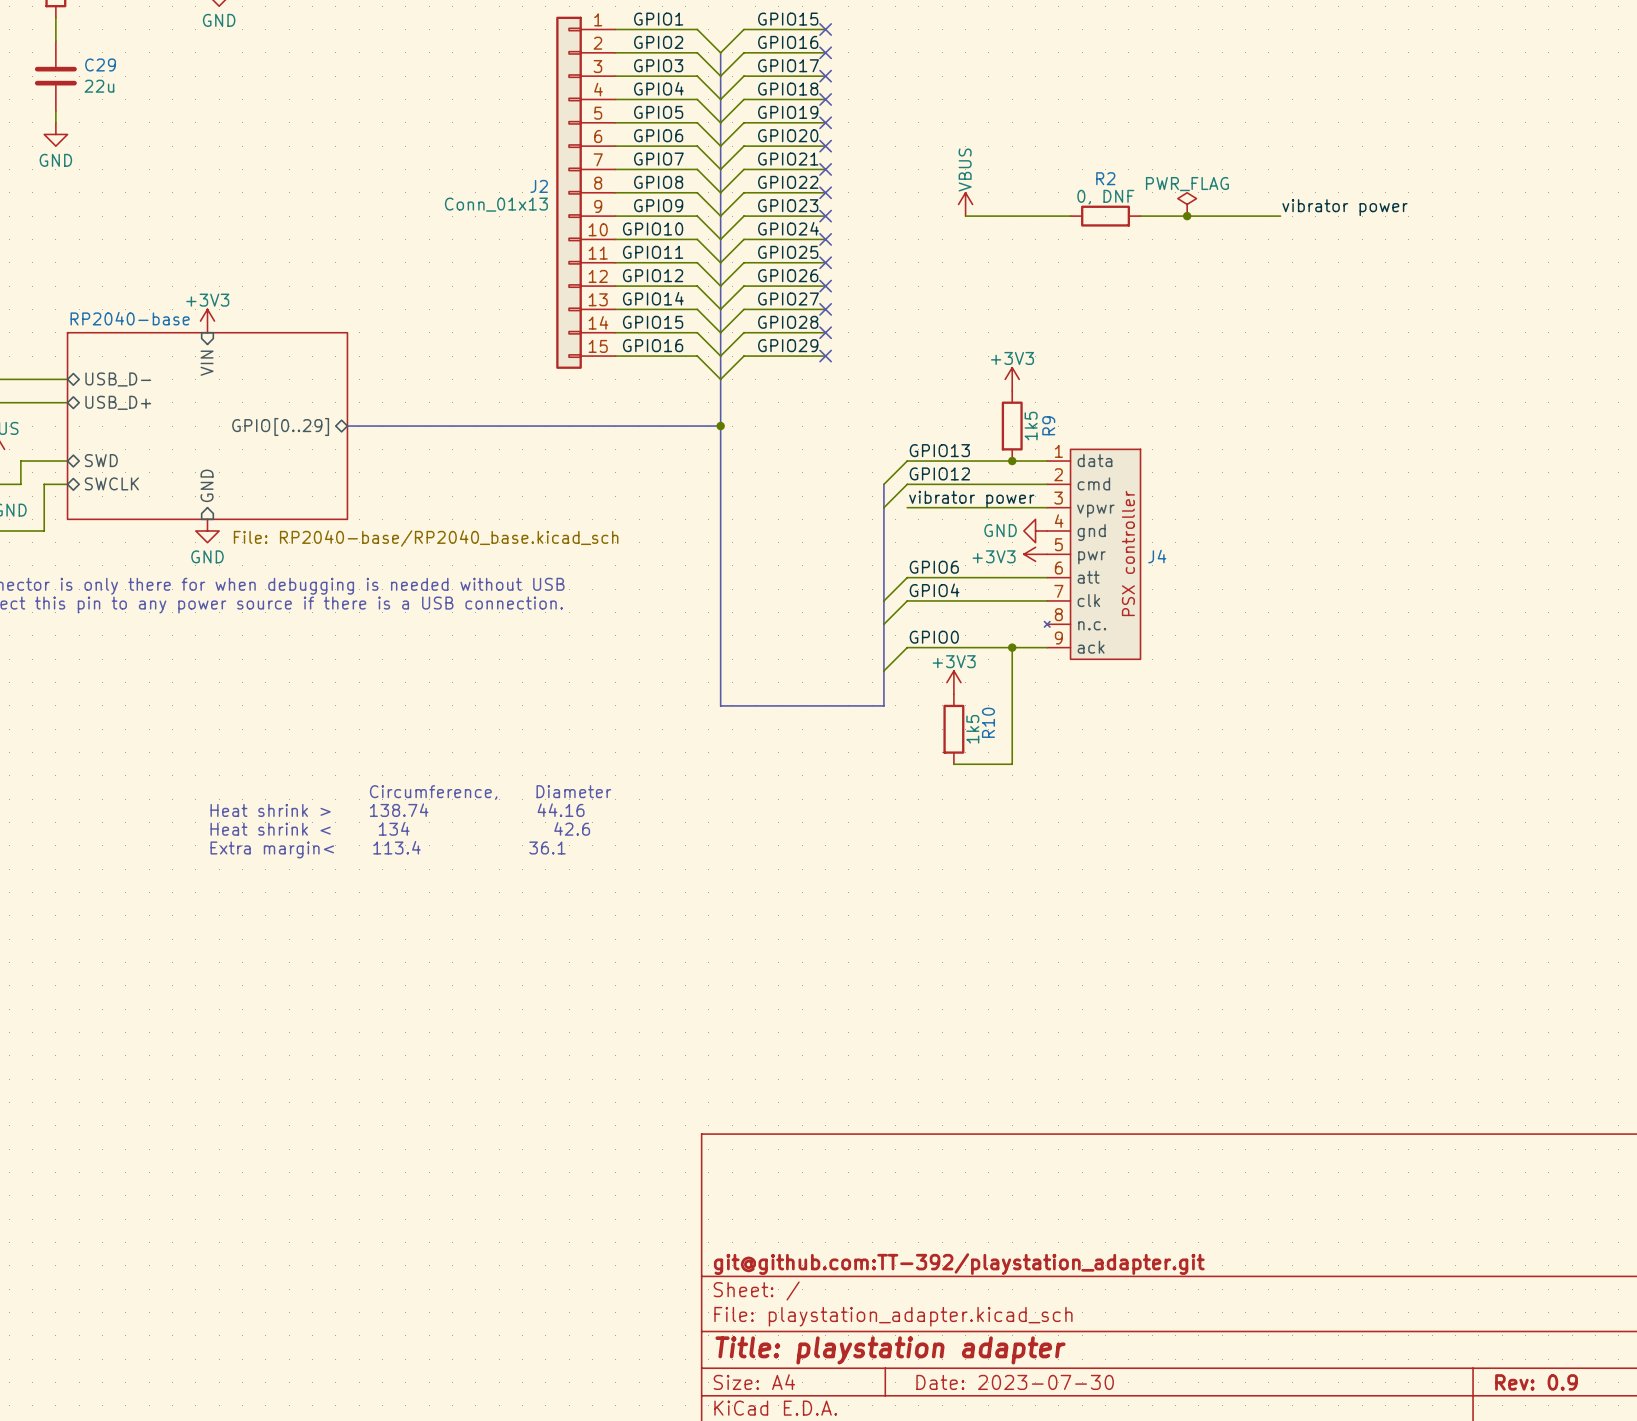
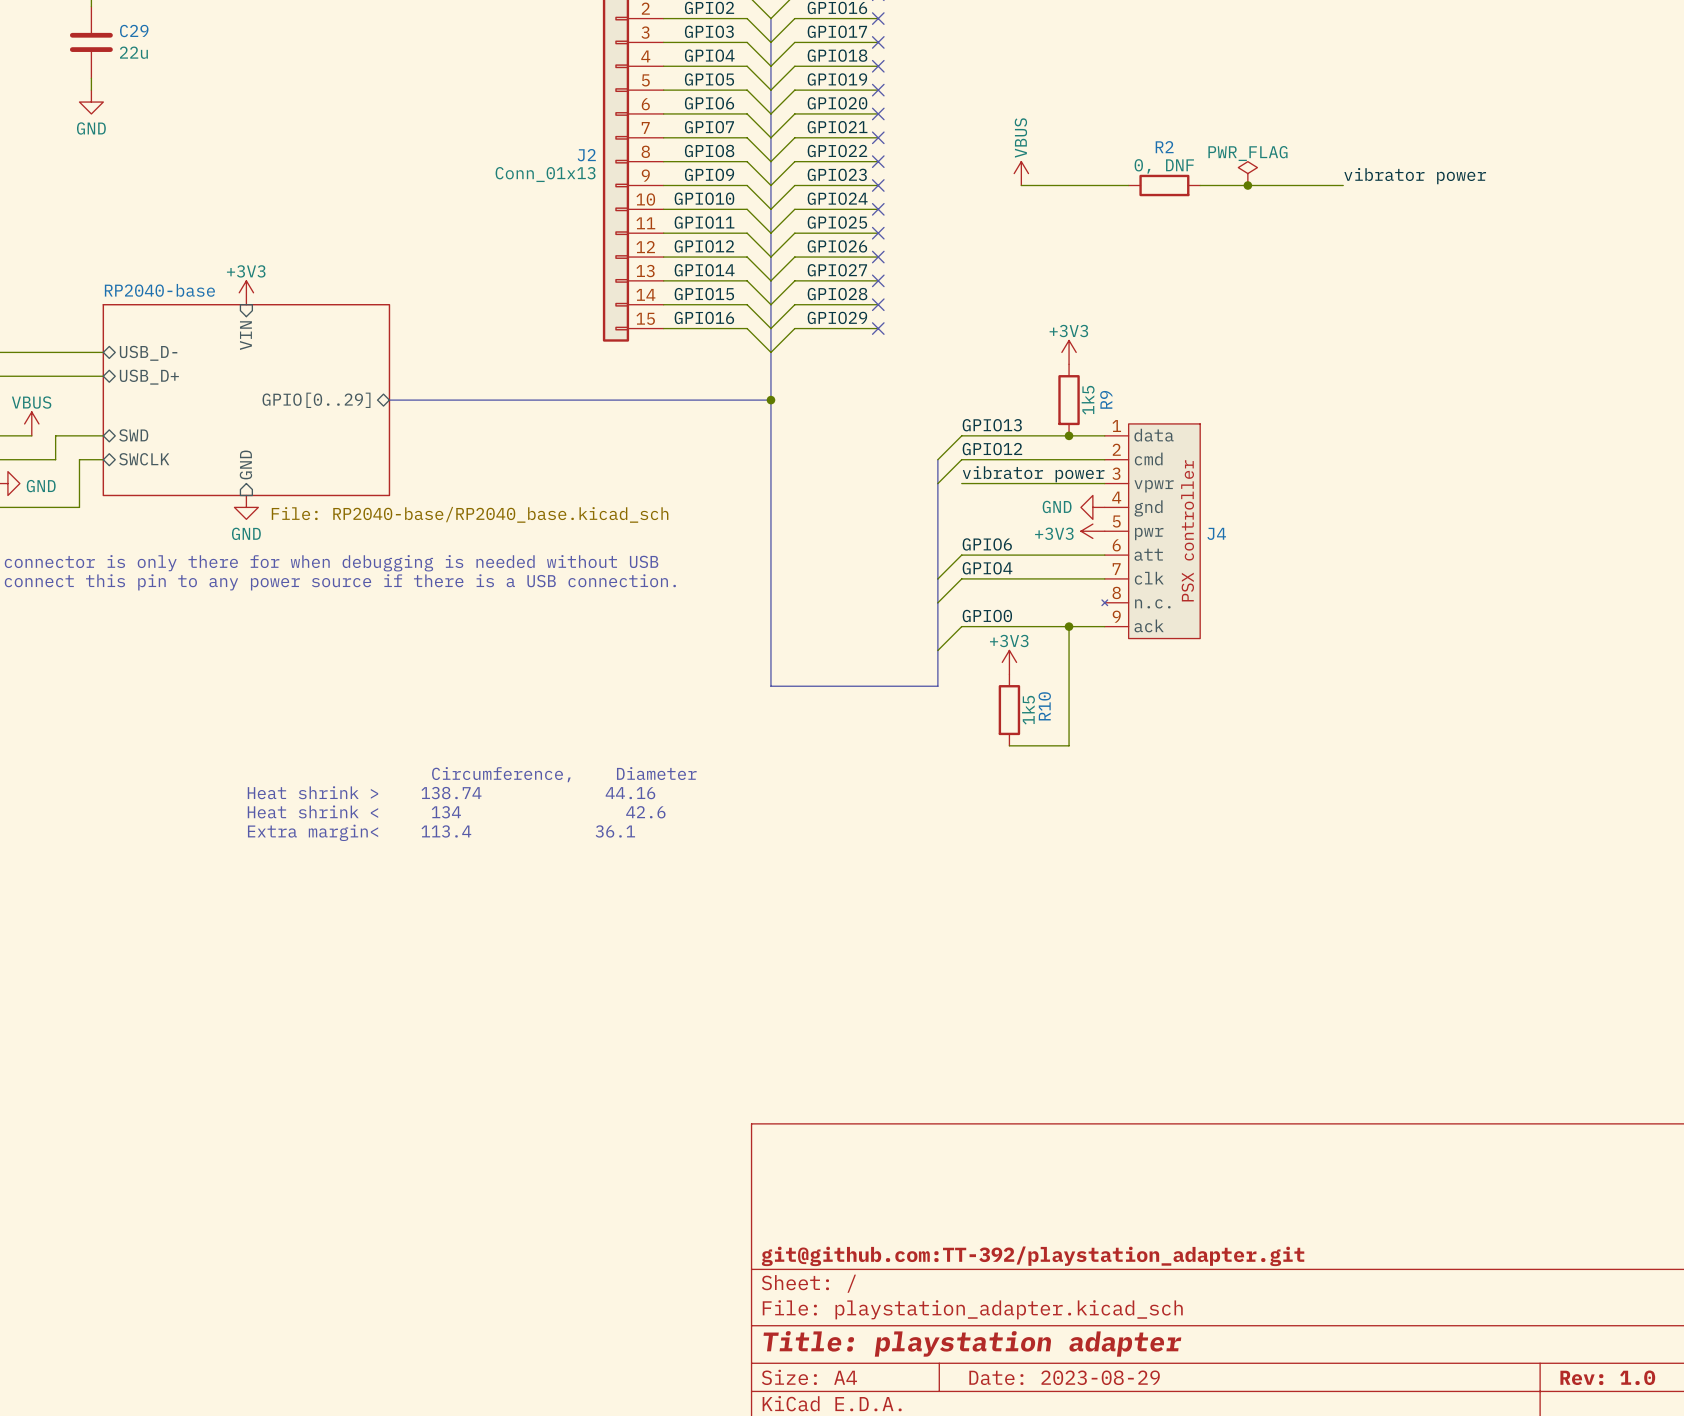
title block: Date: 2023-07-30 (1015, 1382) -> Date: 2023-08-29 (1064, 1377)
title block: Rev: 0.9 (1536, 1382) -> Rev: 1.0 (1607, 1377)

